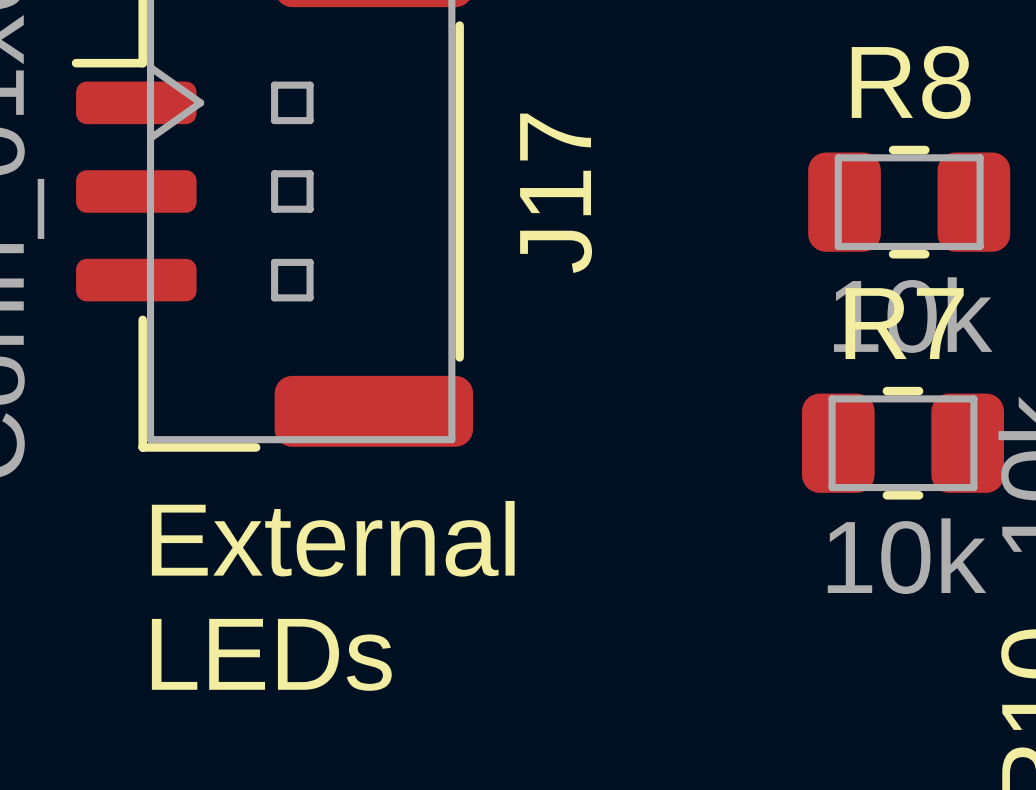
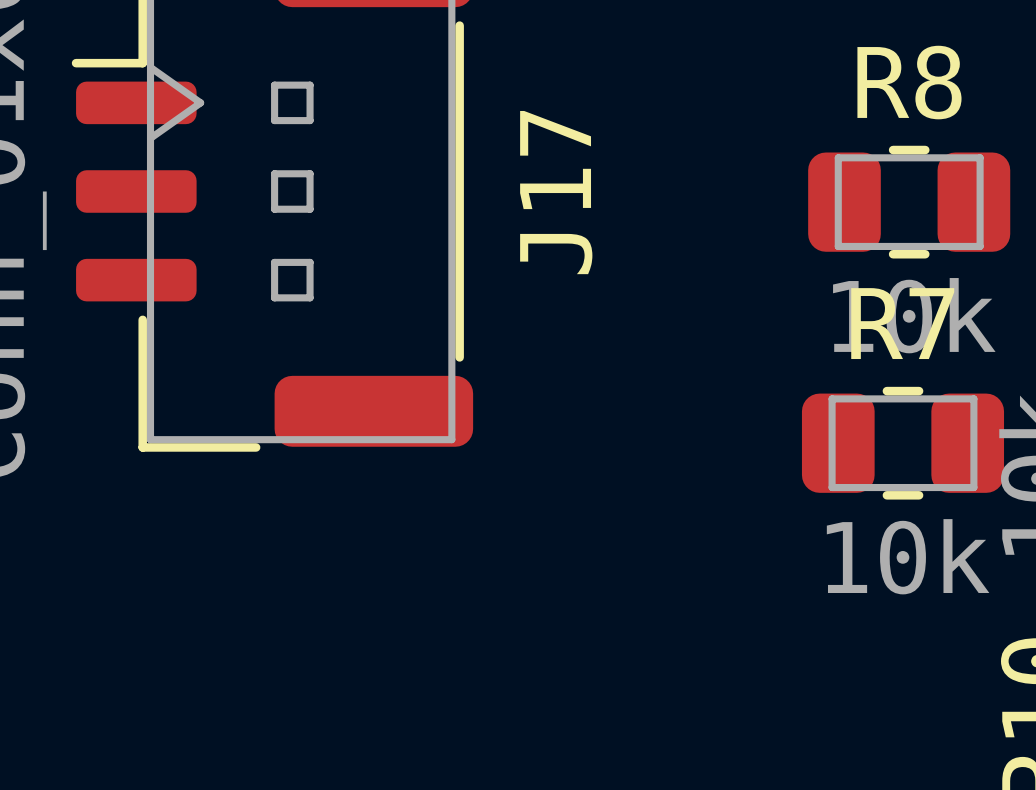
text: External (333, 538) -> none
text: LEDs (271, 654) -> none

